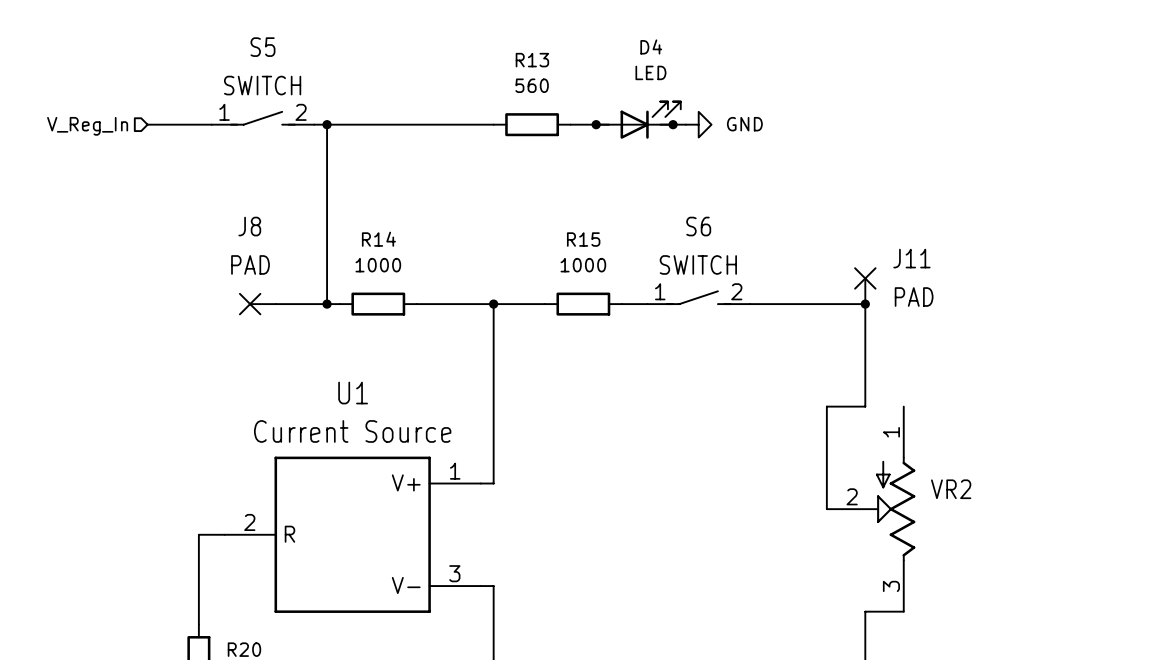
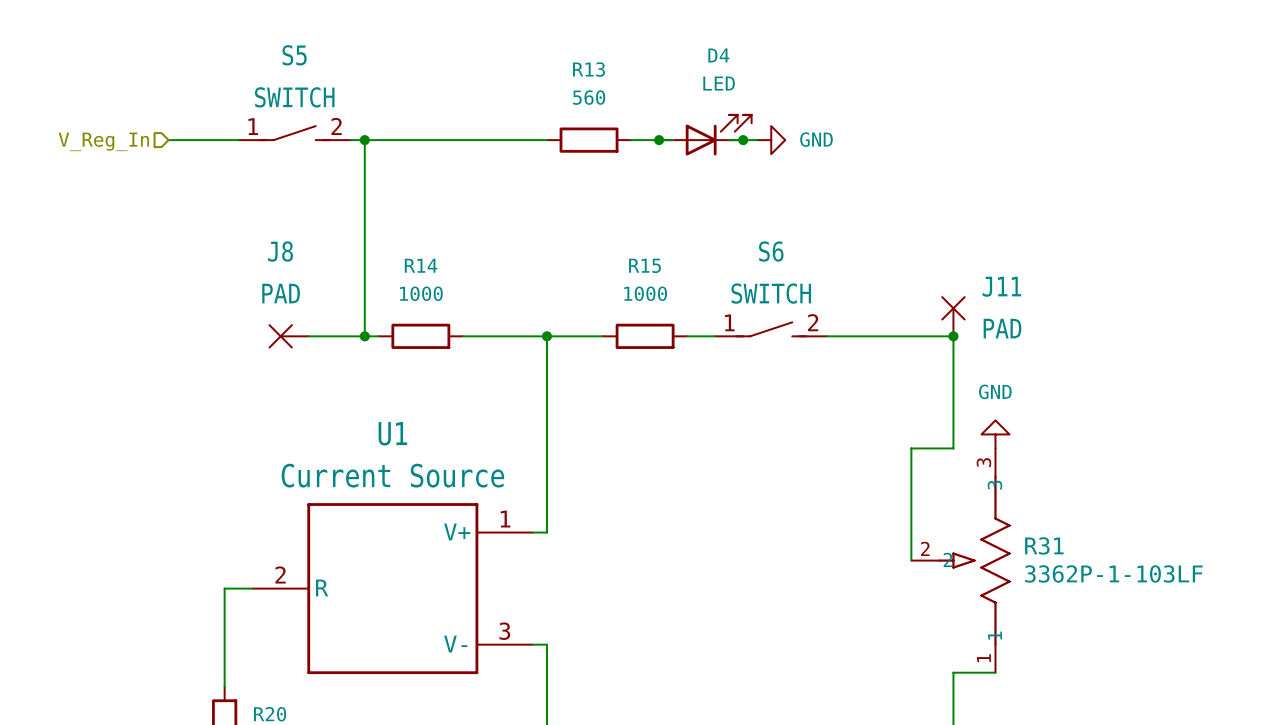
power symbol: none -> GND (995, 434)
VR2: (871, 509) -> none
R31: none -> 3362P-1-103LF (961, 560)

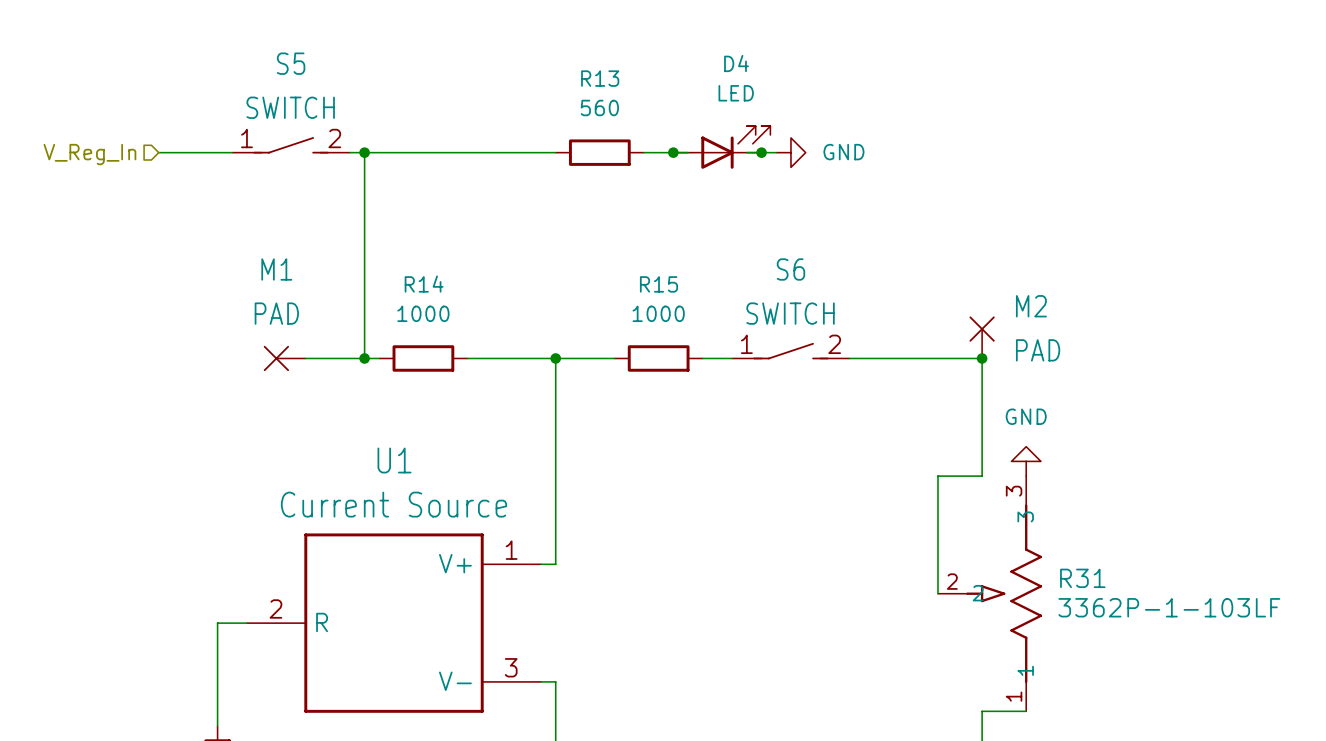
J8 name: J8 (280, 251) -> M1 (276, 269)
J11 name: J11 (1001, 286) -> M2 (1031, 306)

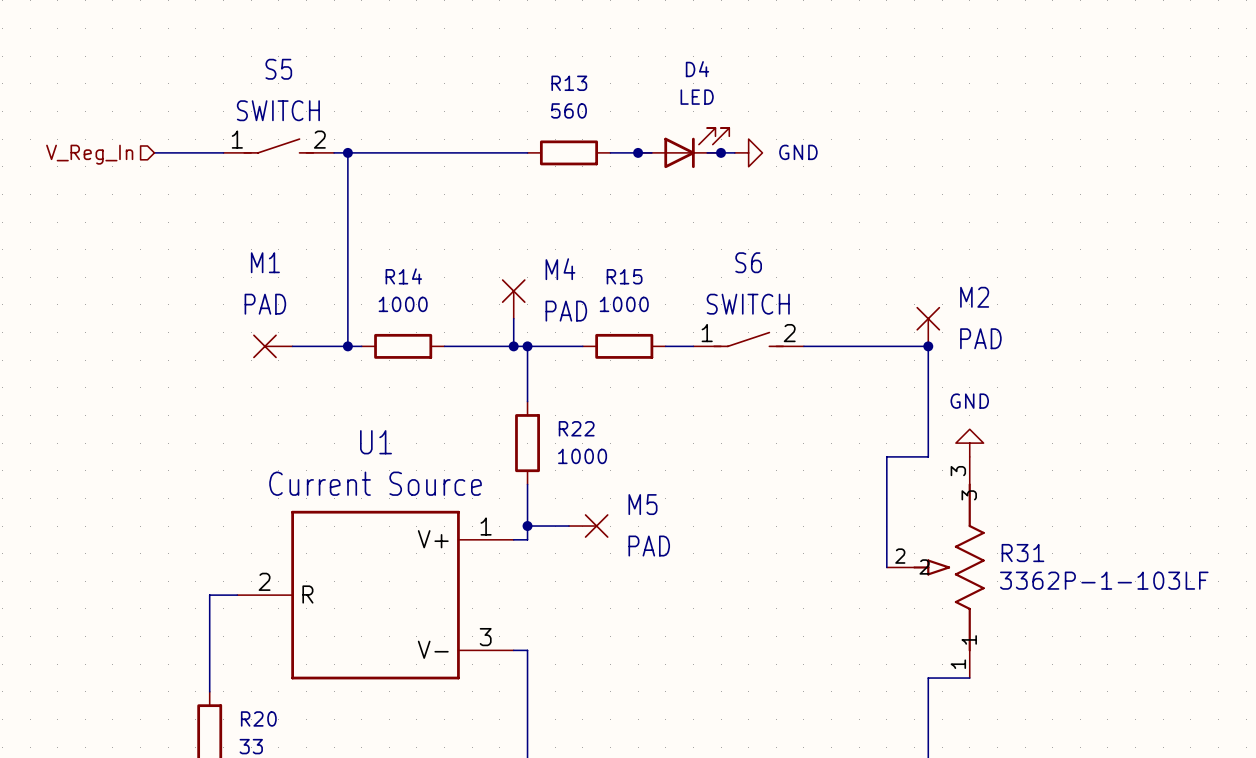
M4: none -> PAD (513, 298)
wire: none -> (513, 318) (513, 346)
junction: none -> (513, 346)
wire: (555, 417) (555, 505) -> none
R22: none -> 1000 (527, 443)
wire: none -> (527, 526) (568, 526)
junction: none -> (527, 526)
M5: none -> PAD (588, 526)

